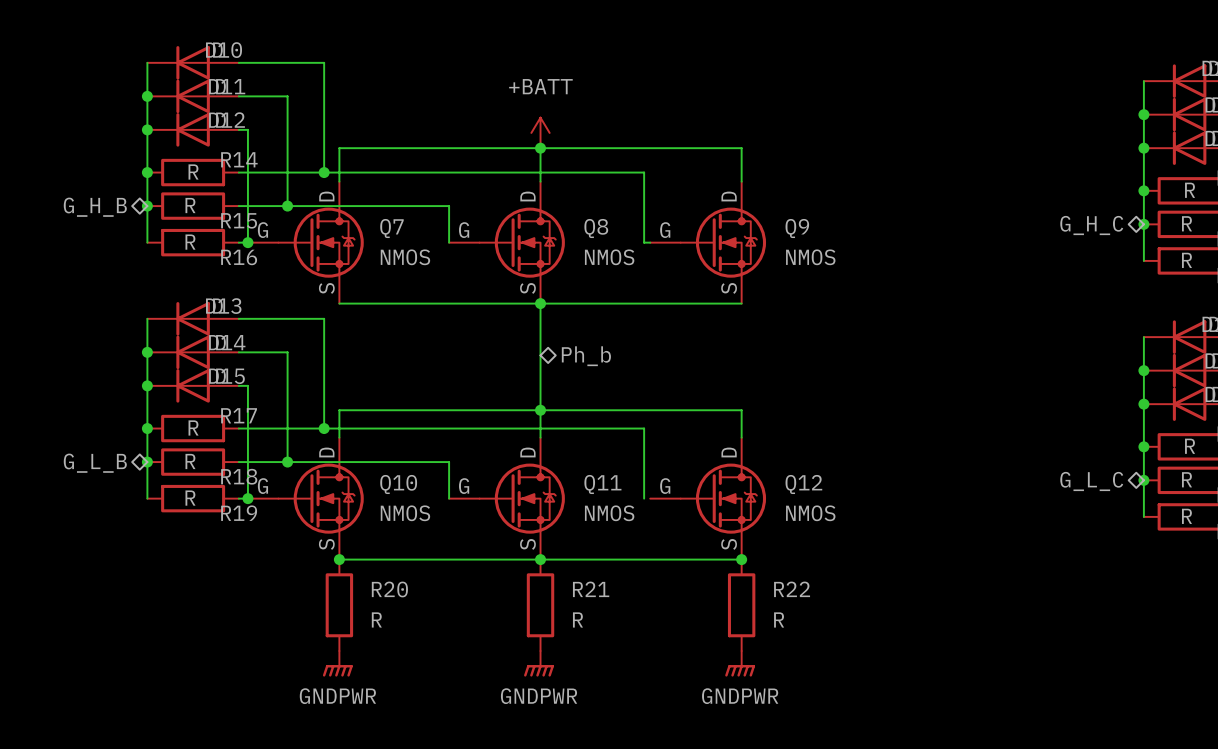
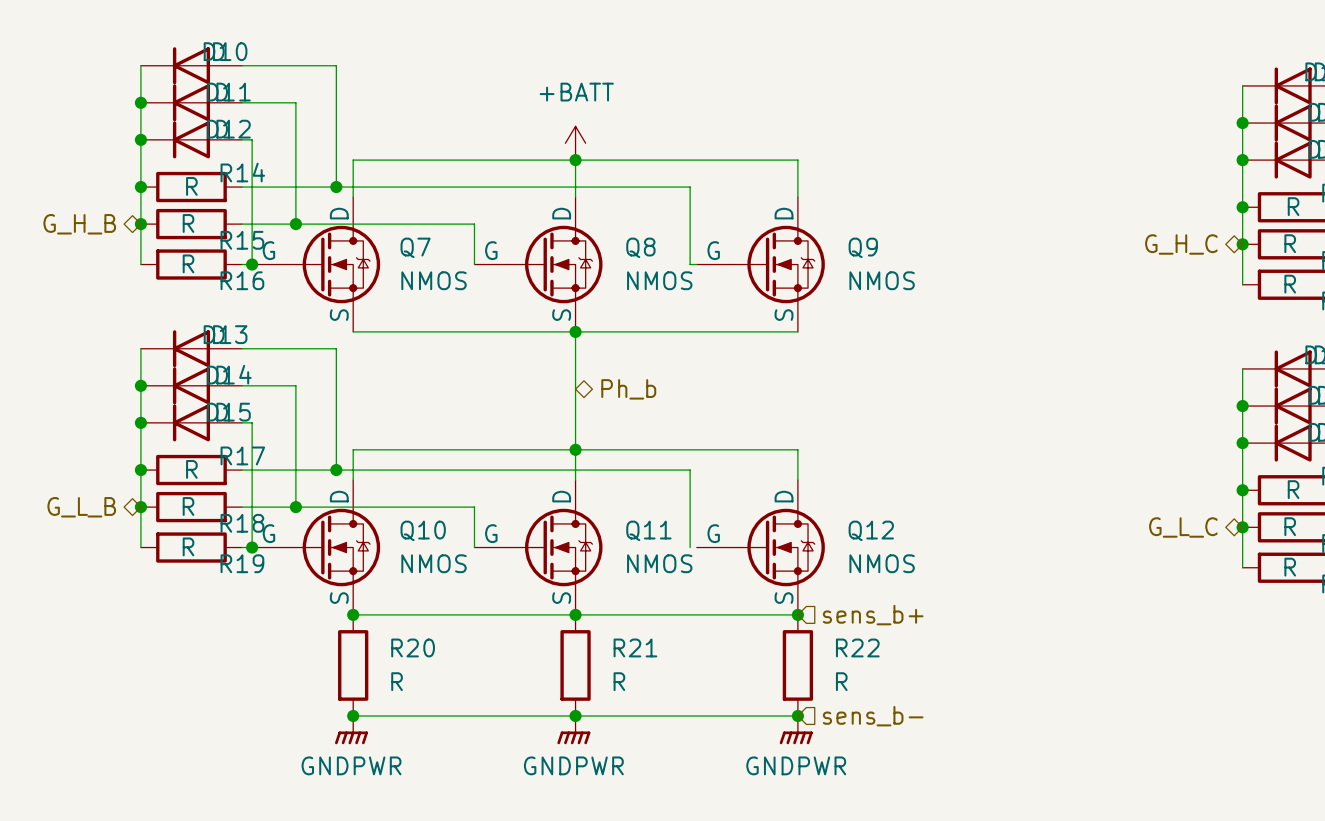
hierarchical label: none -> sens_b+ (873, 615)
wire: none -> (353, 715) (797, 715)
junction: none -> (353, 715)
junction: none -> (575, 715)
junction: none -> (797, 715)
hierarchical label: none -> sens_b- (873, 716)

